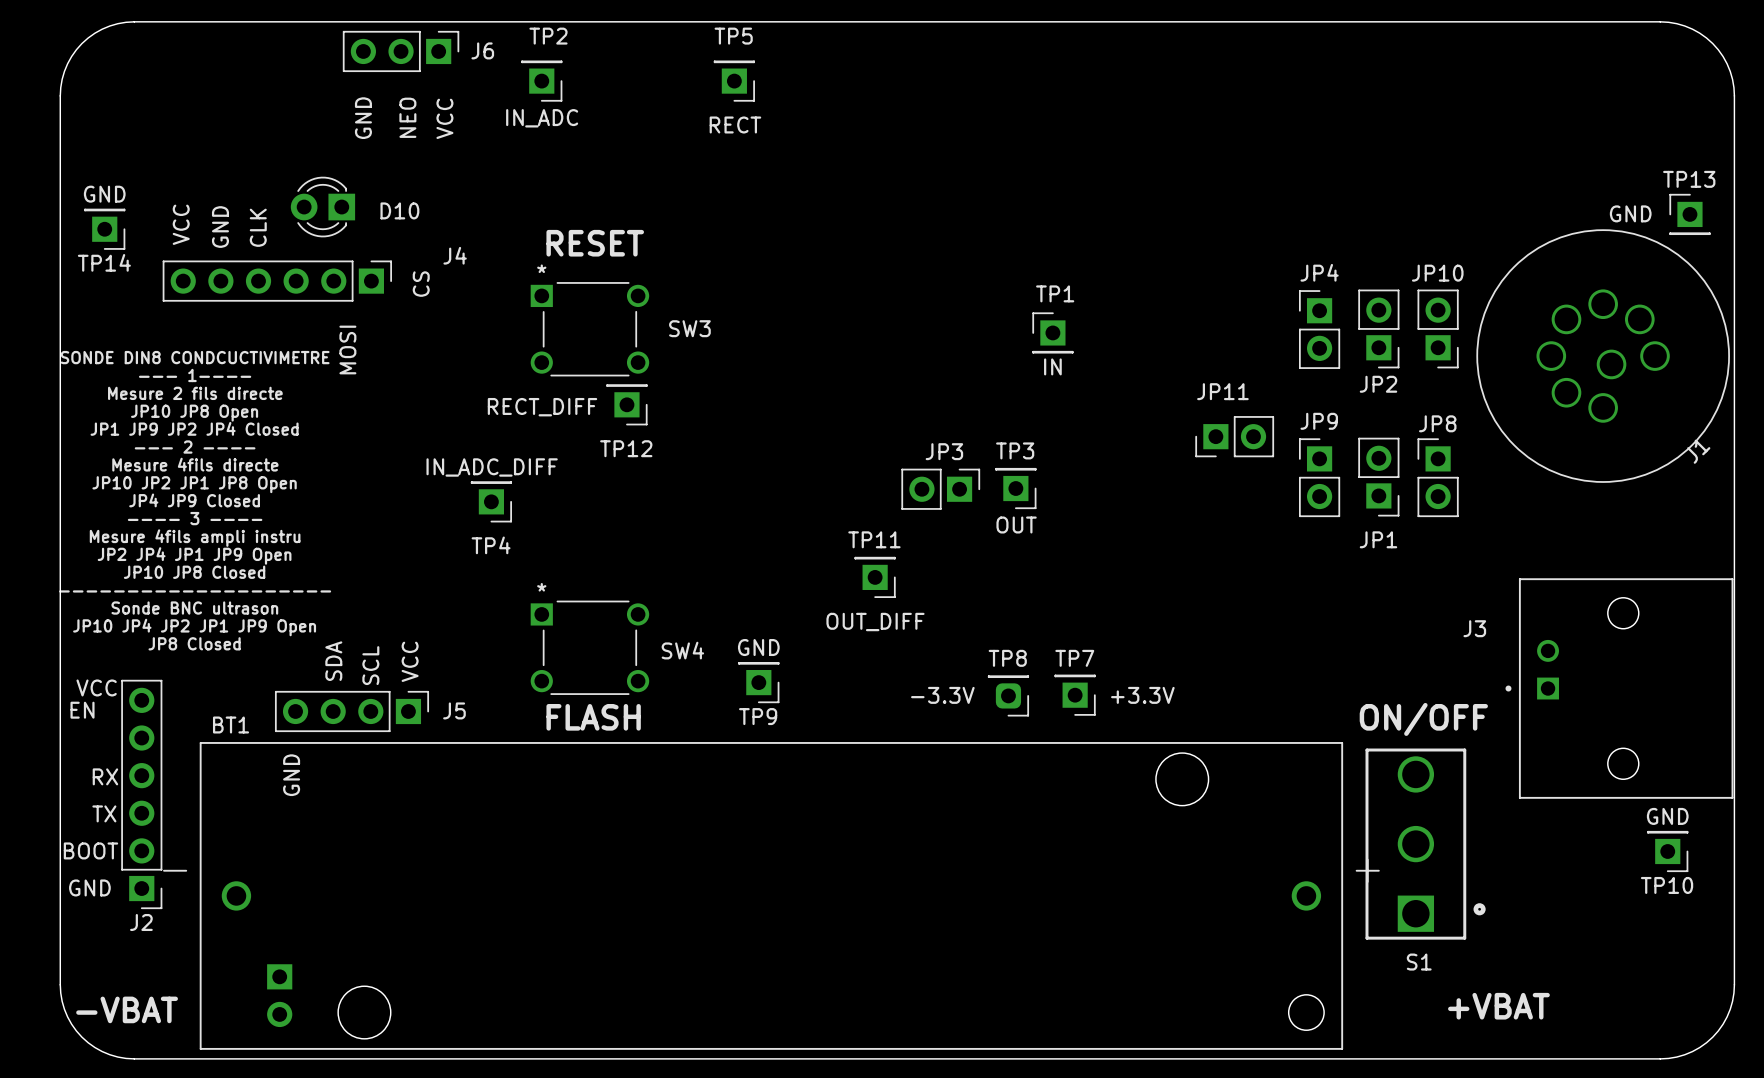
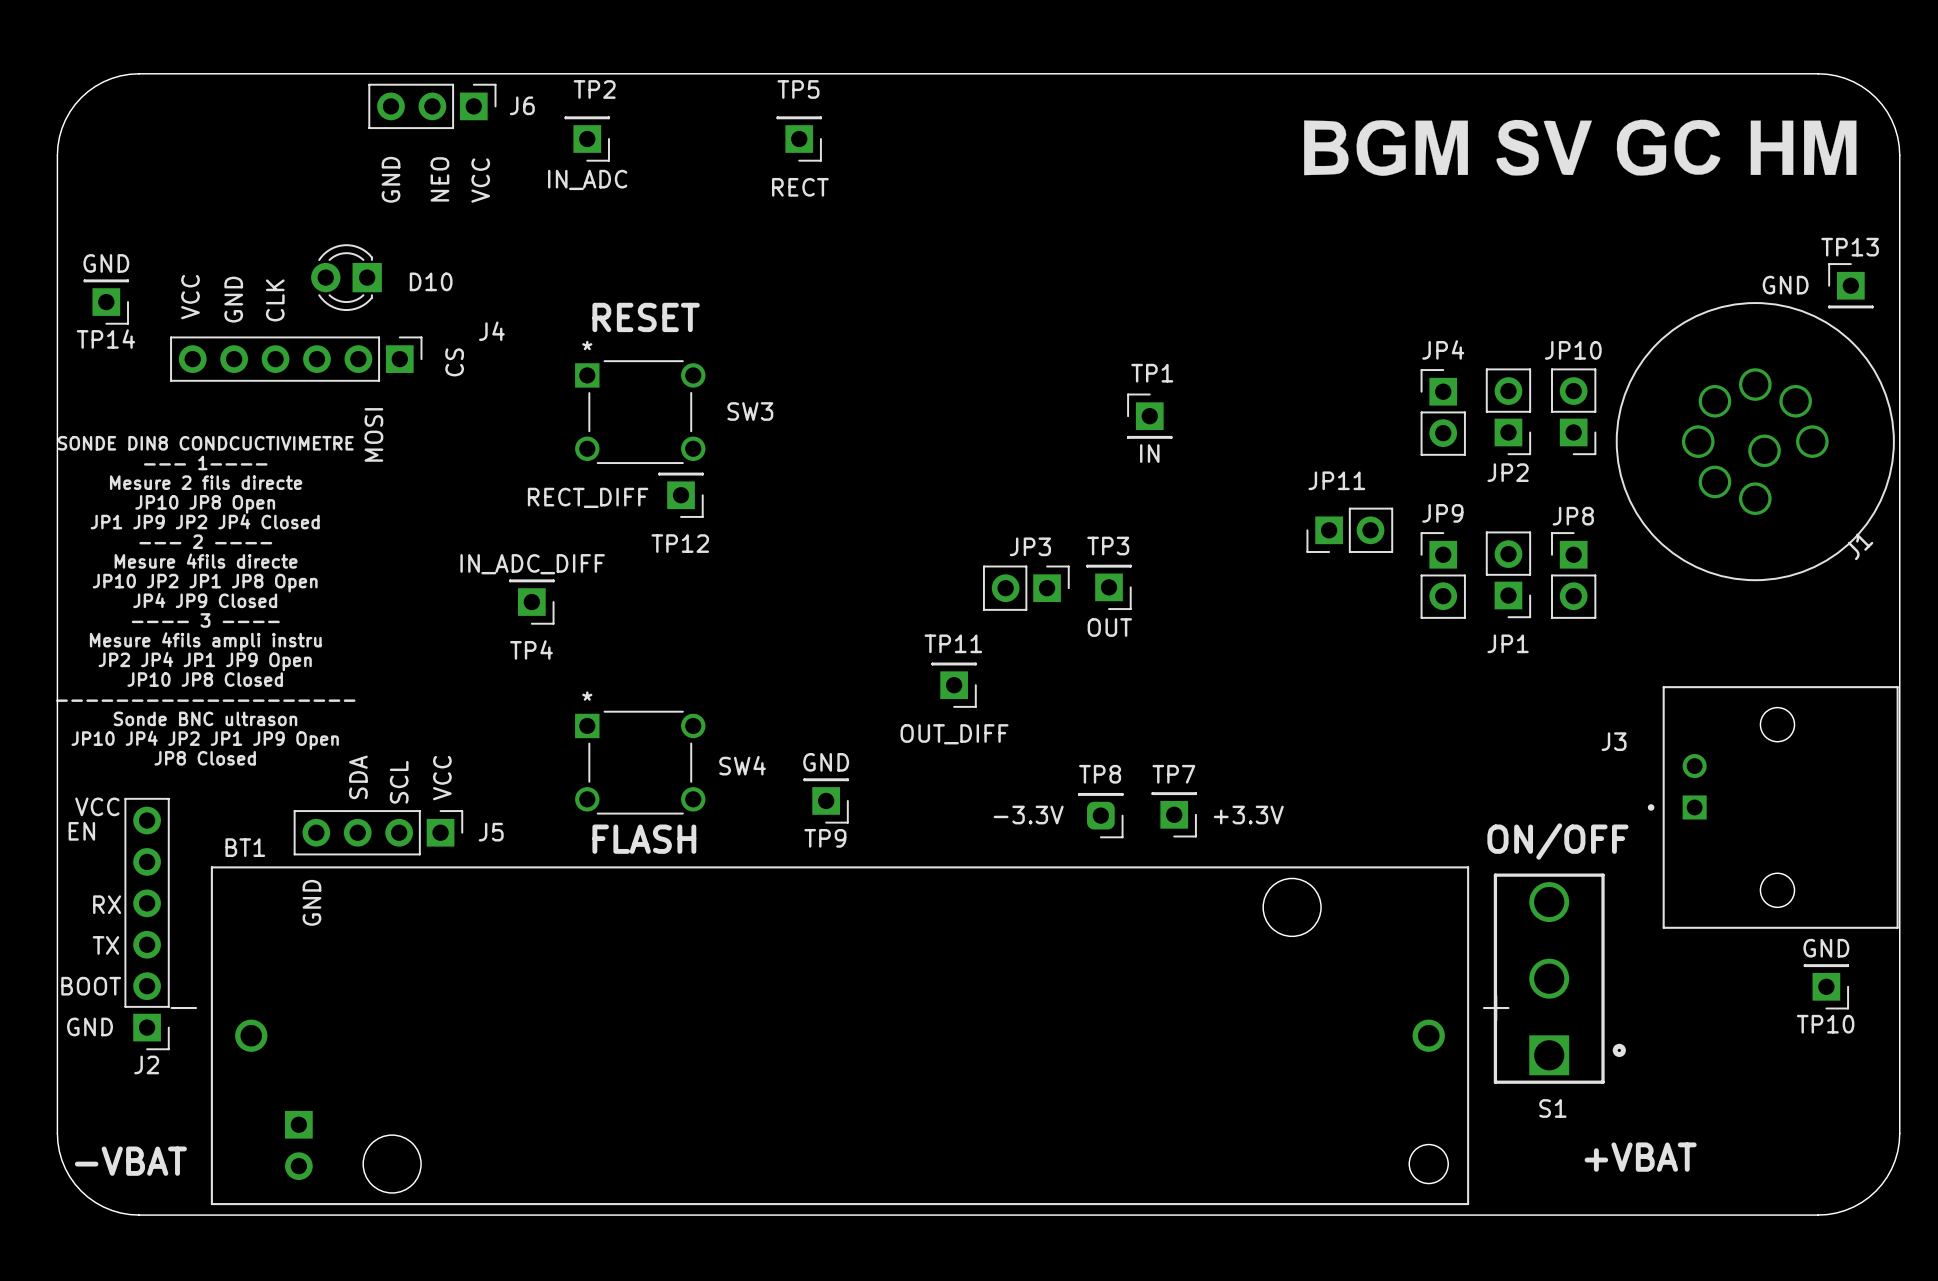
drawing: none -> [1304, 119, 1857, 176]

